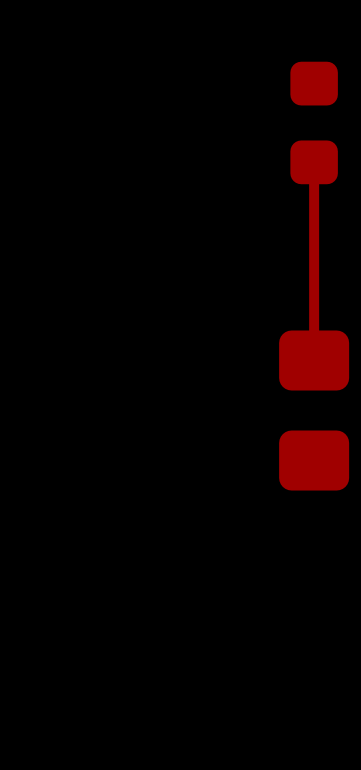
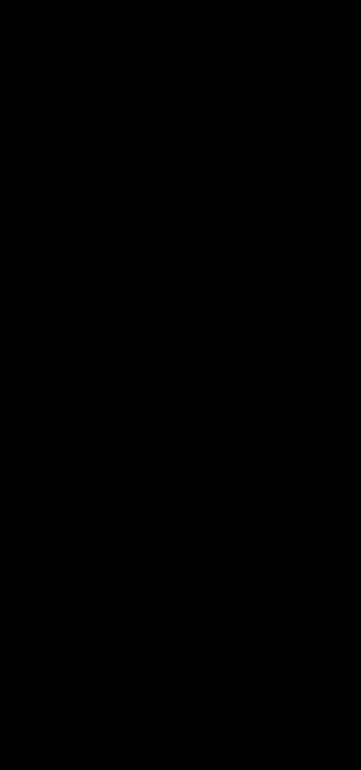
part: (314, 122) -> none
top track: (314, 162) (314, 360) -> none
part: (314, 410) -> none

